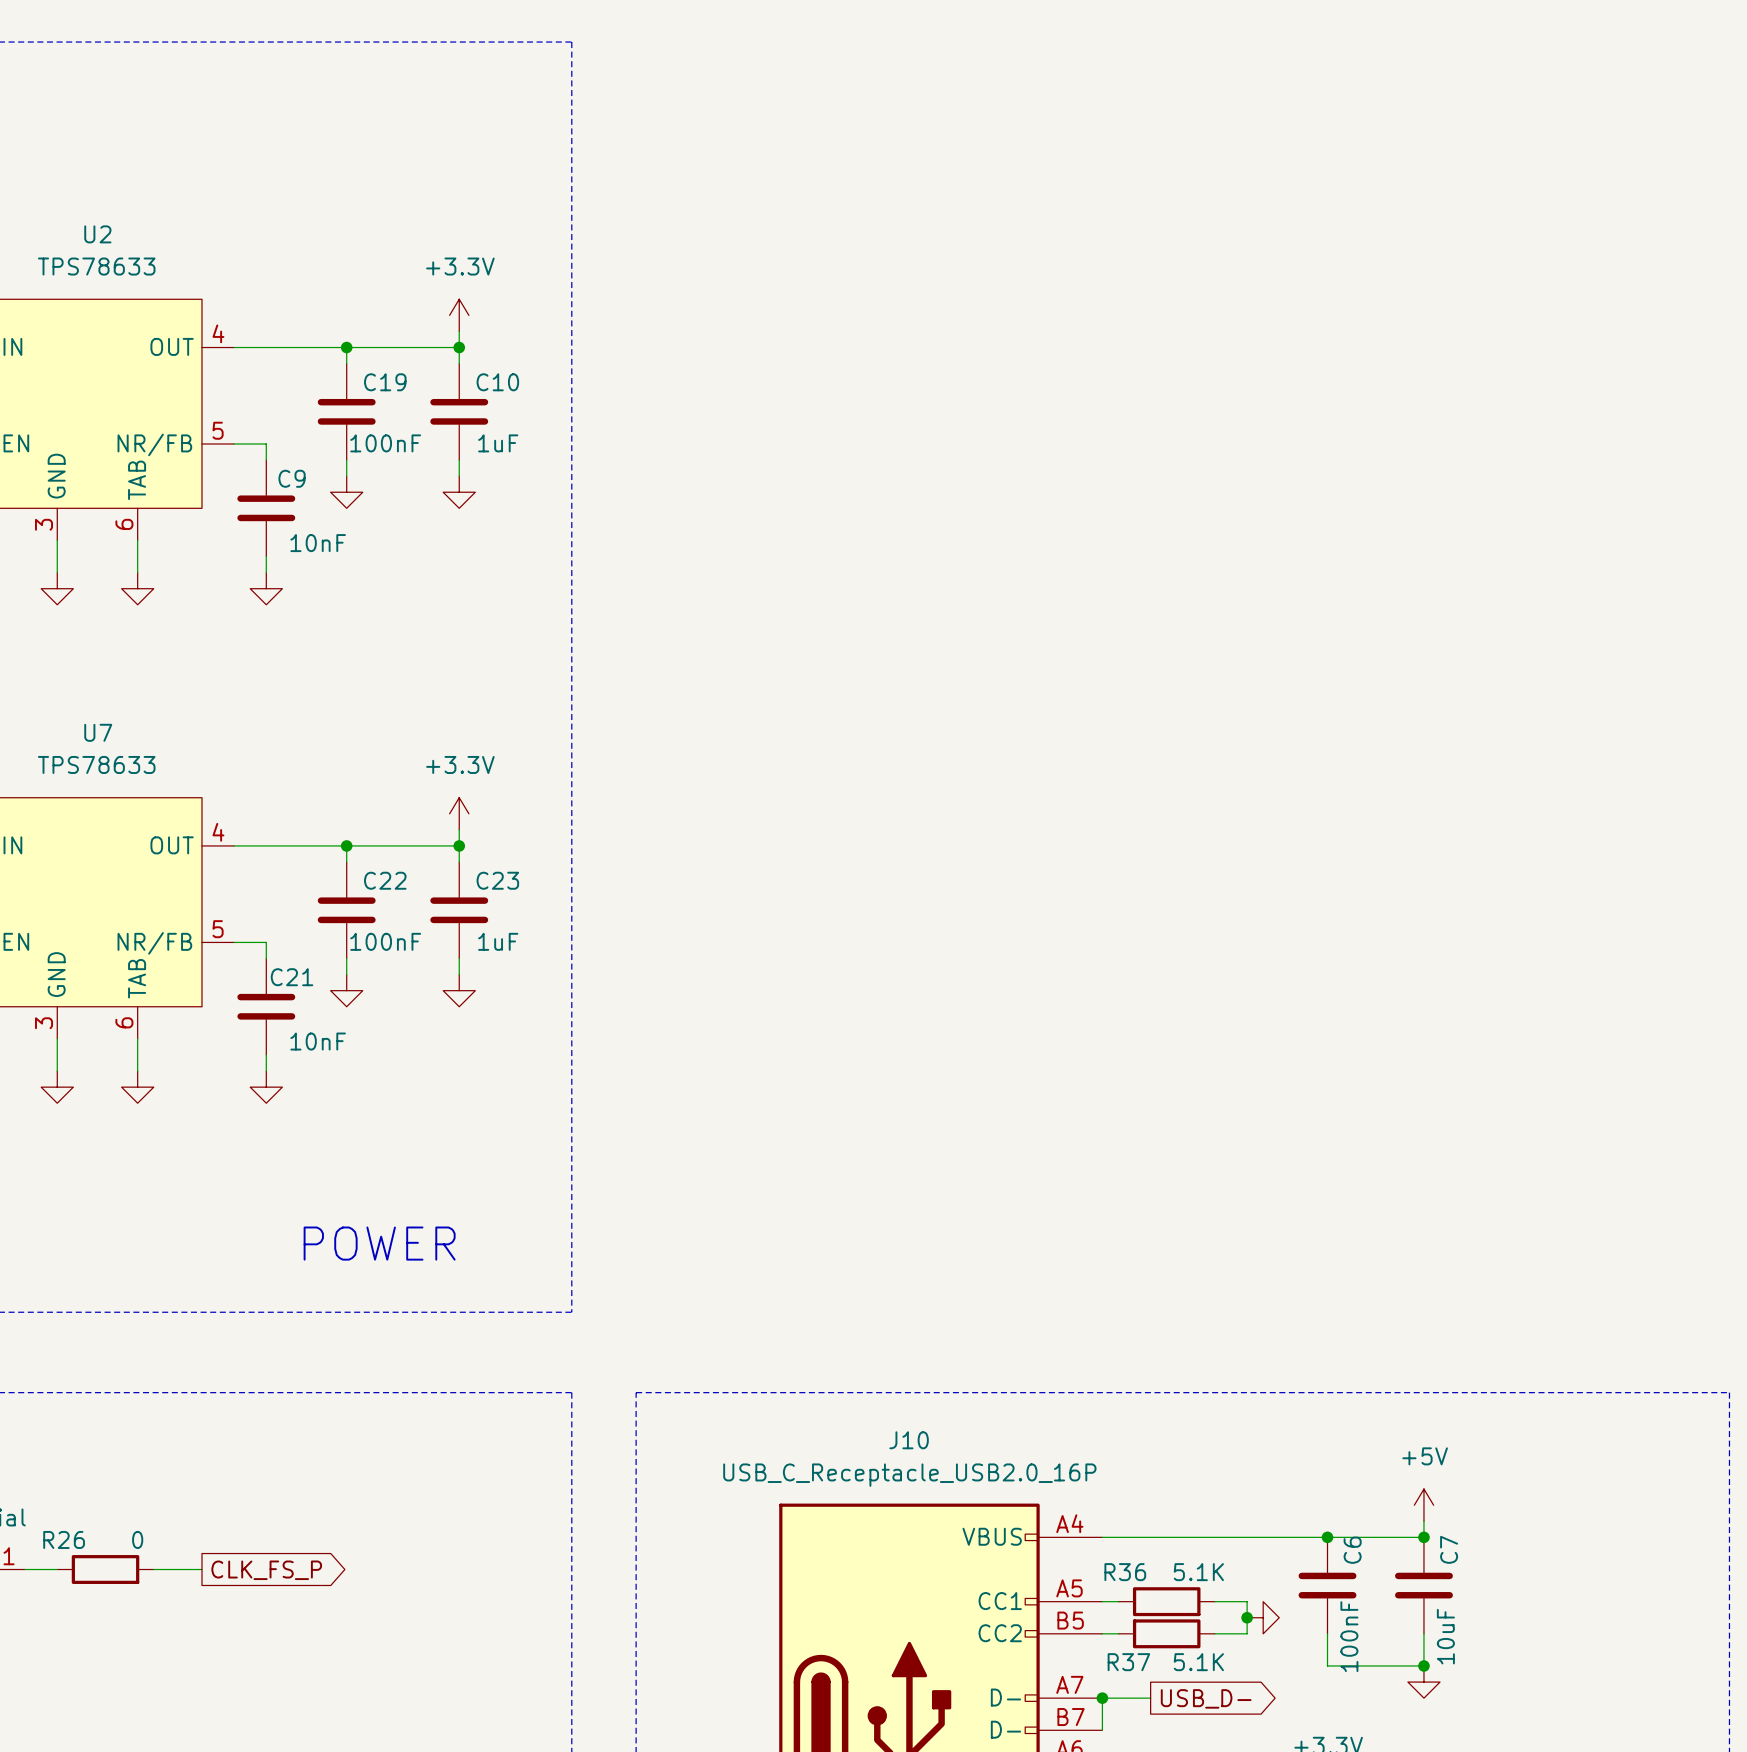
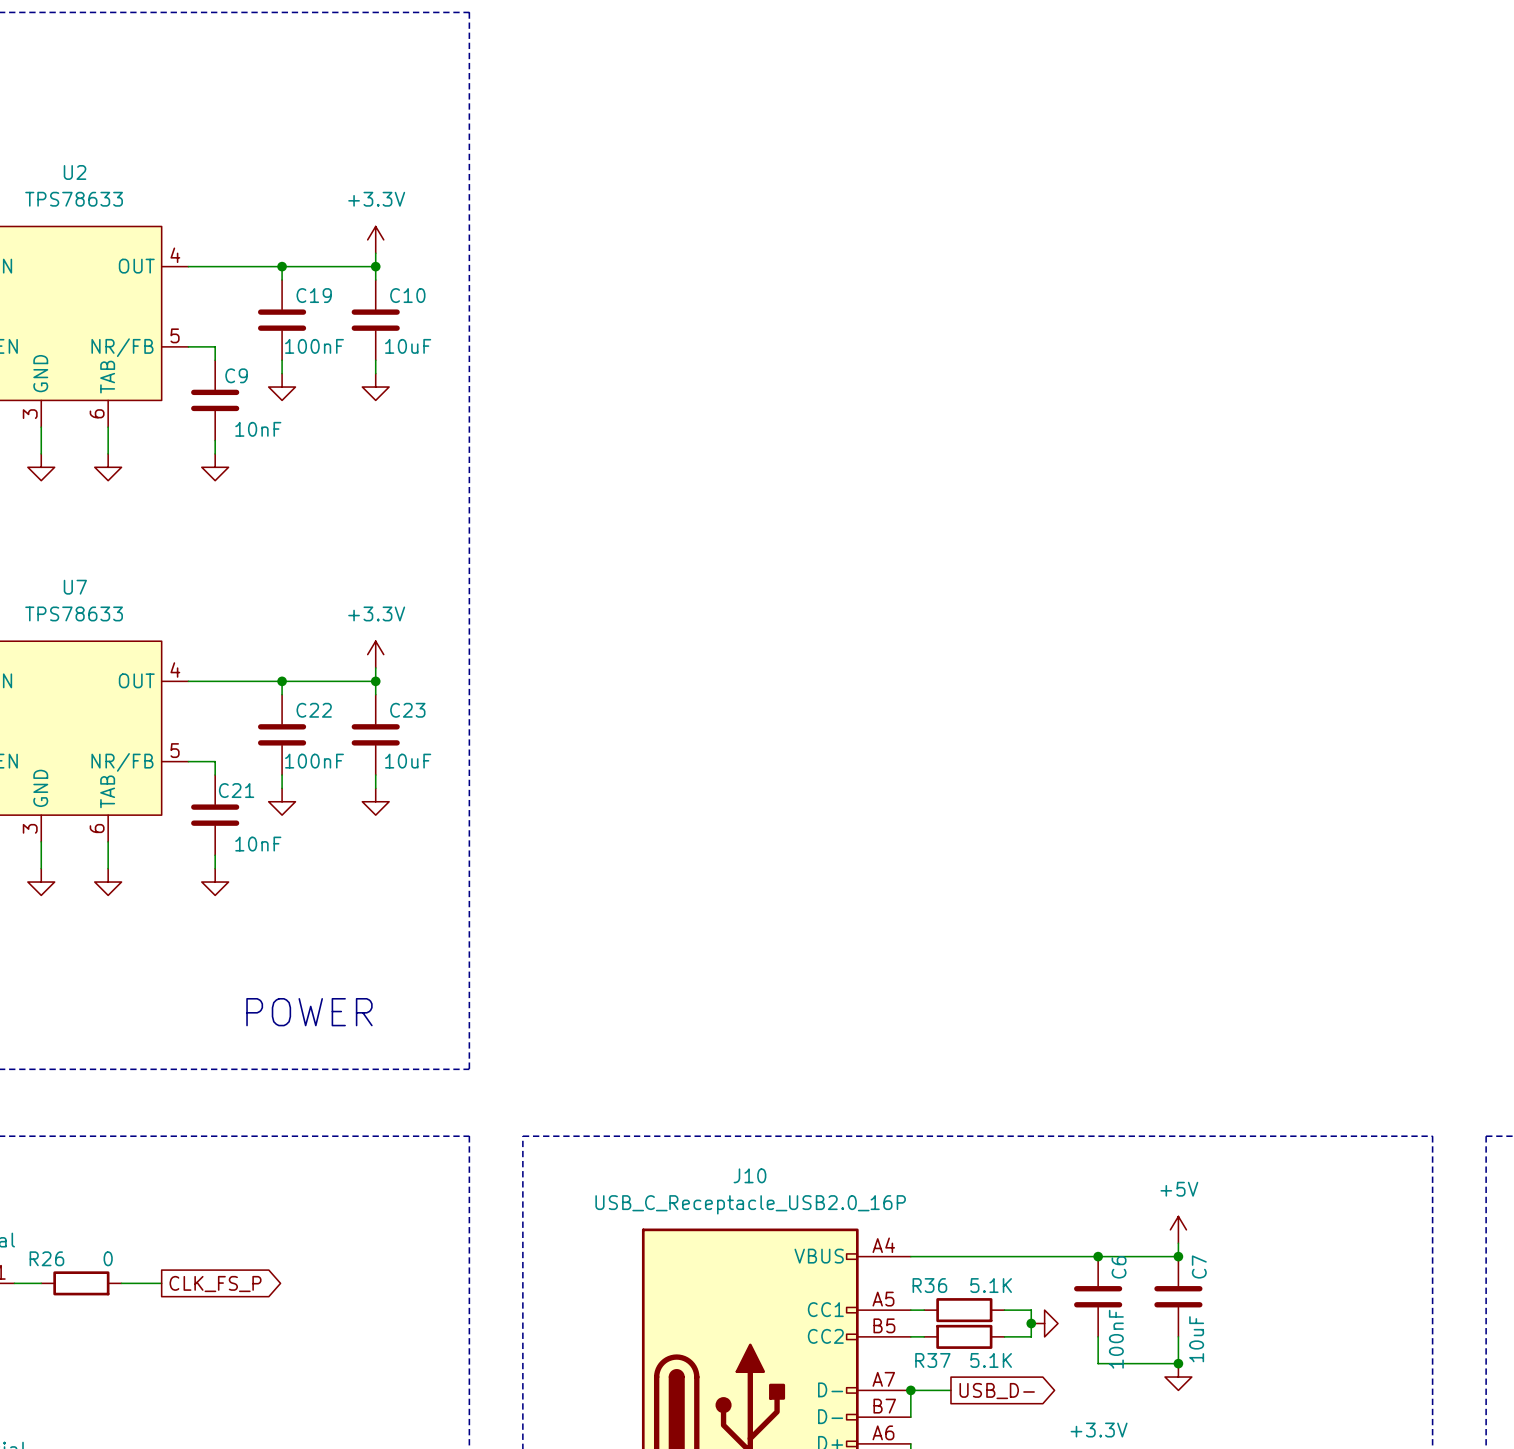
C10 value: 1uF (498, 443) -> 10uF (408, 346)
C23 value: 1uF (498, 941) -> 10uF (408, 761)

